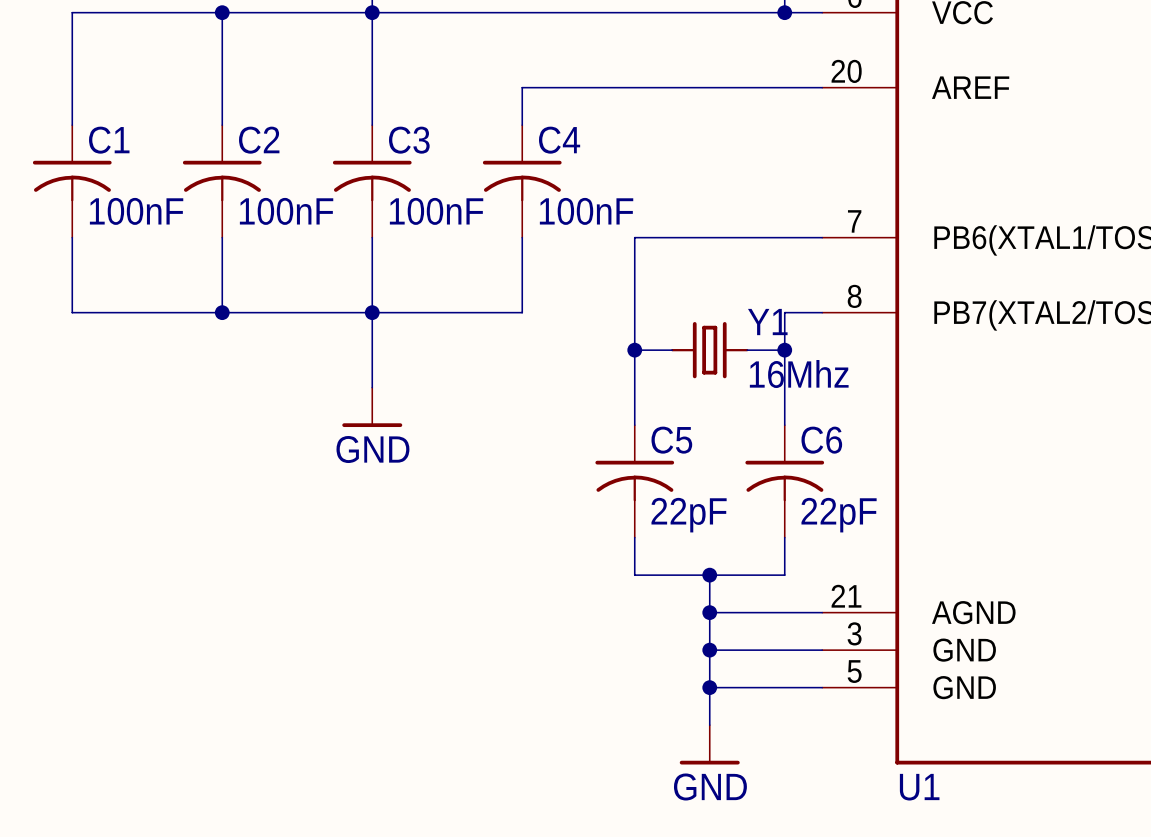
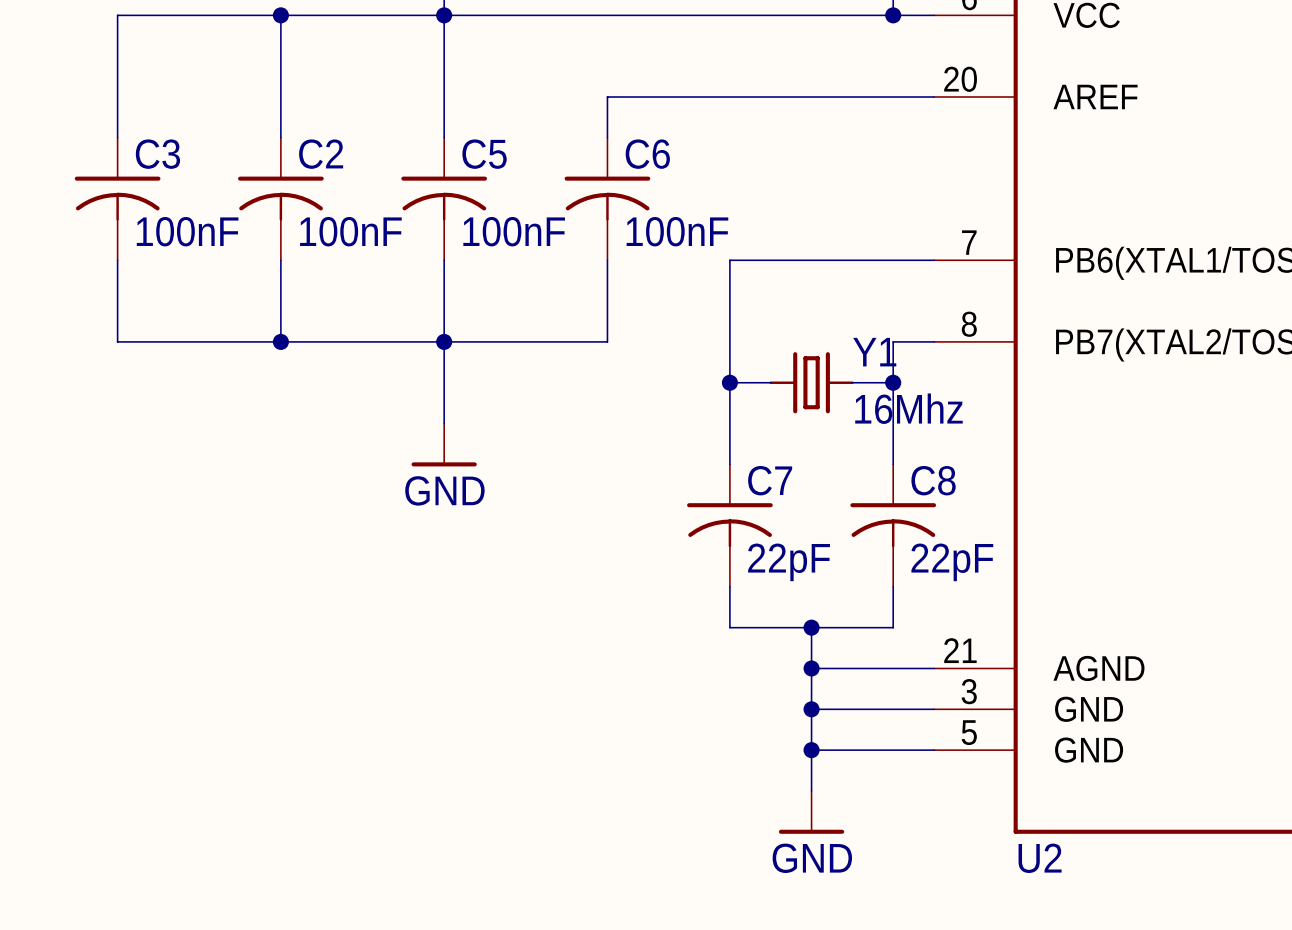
C1 name: C1 (109, 140) -> C3 (157, 154)
C3 name: C3 (409, 140) -> C5 (484, 154)
C4 name: C4 (559, 140) -> C6 (647, 154)
C5 name: C5 (671, 440) -> C7 (770, 480)
C6 name: C6 (821, 440) -> C8 (933, 480)
U1 name: U1 (919, 787) -> U2 (1040, 858)

